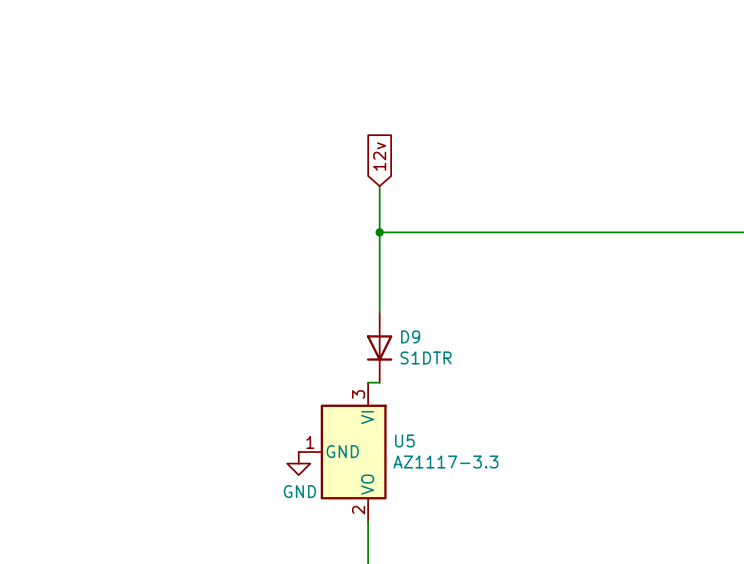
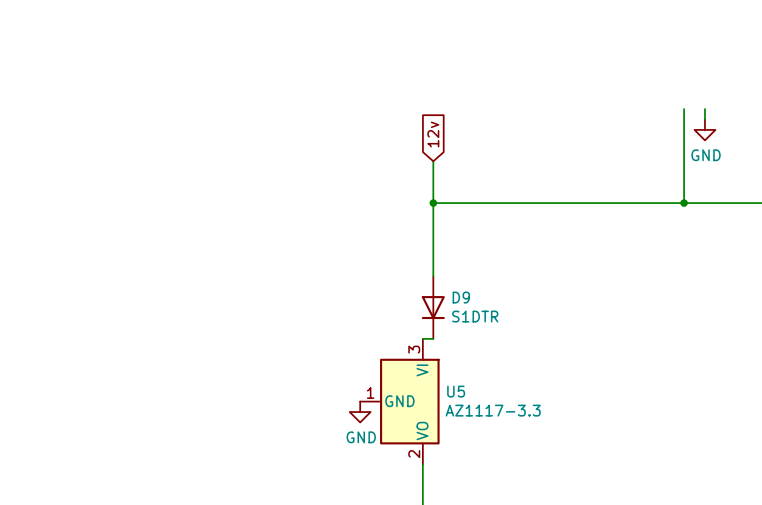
wire: none -> (684, 109) (684, 203)
wire: none -> (704, 109) (704, 119)
power symbol: none -> GND (704, 129)
junction: none -> (684, 203)

